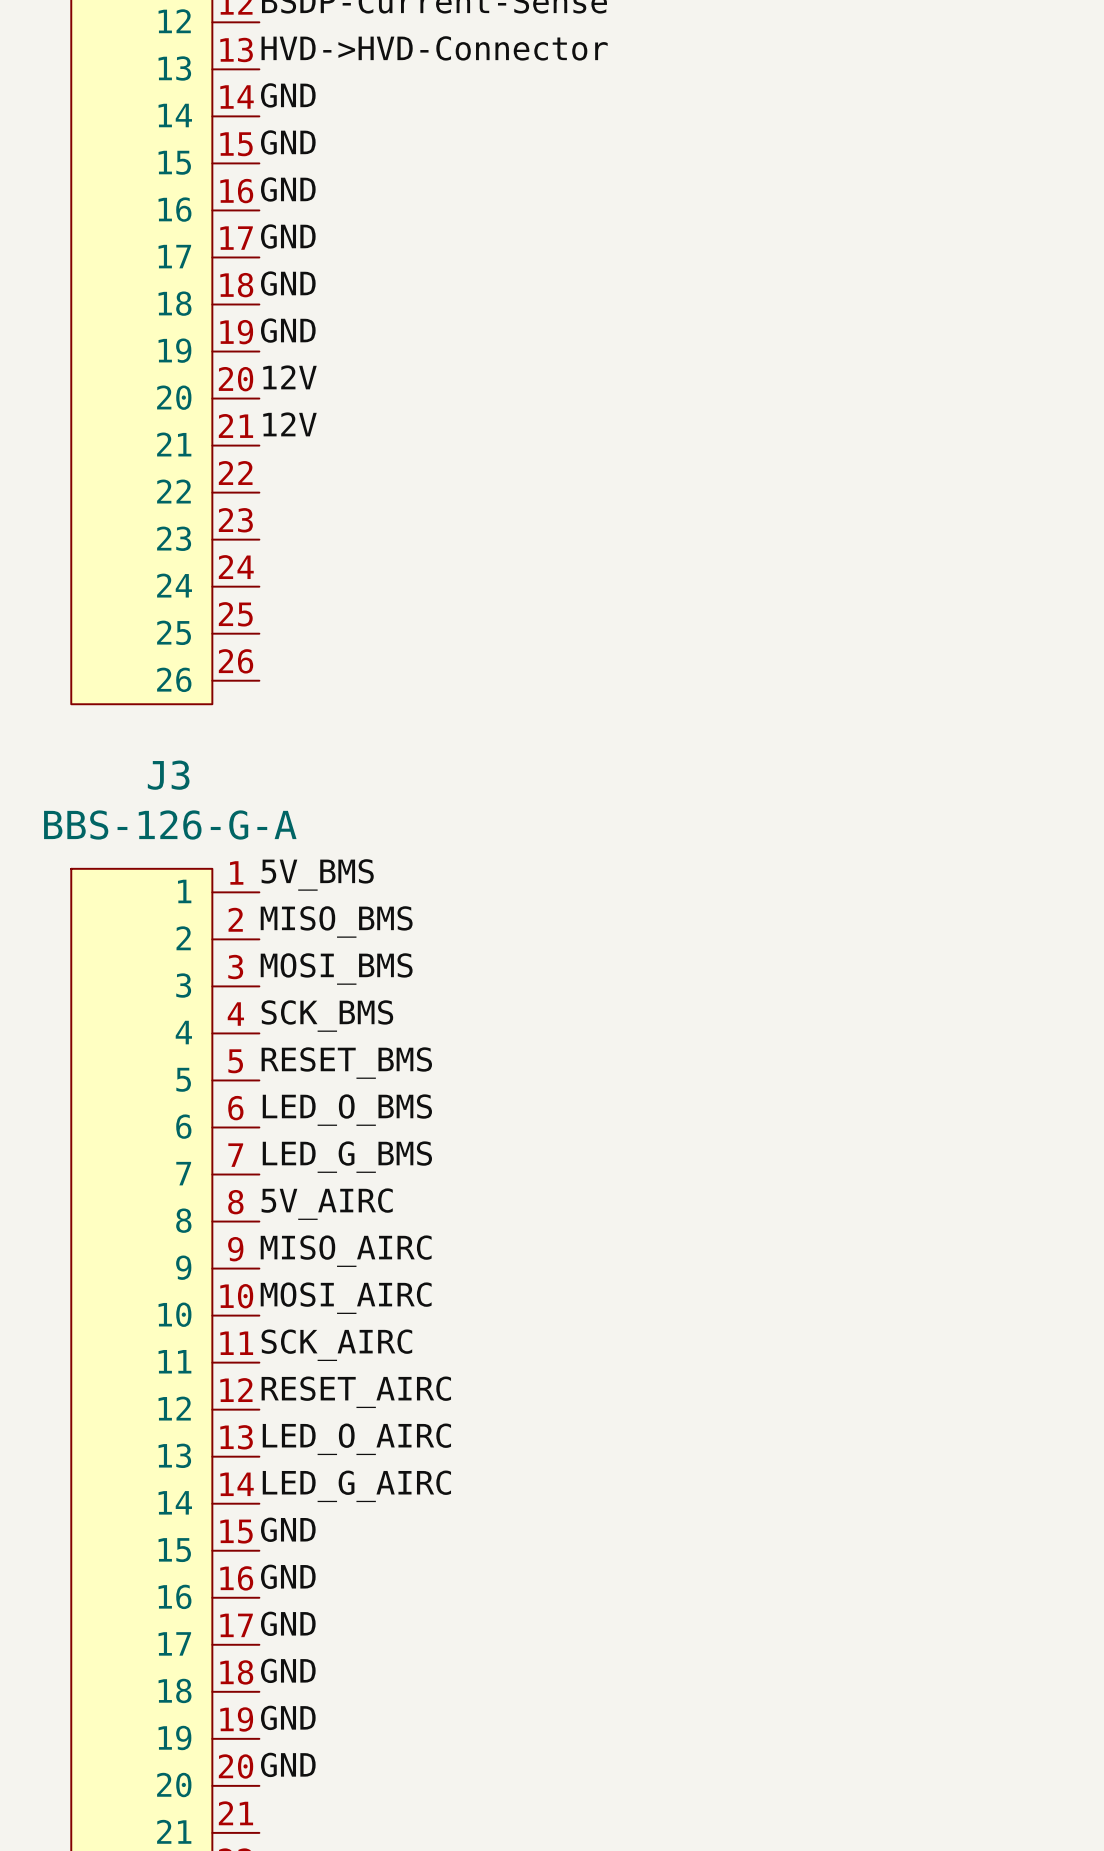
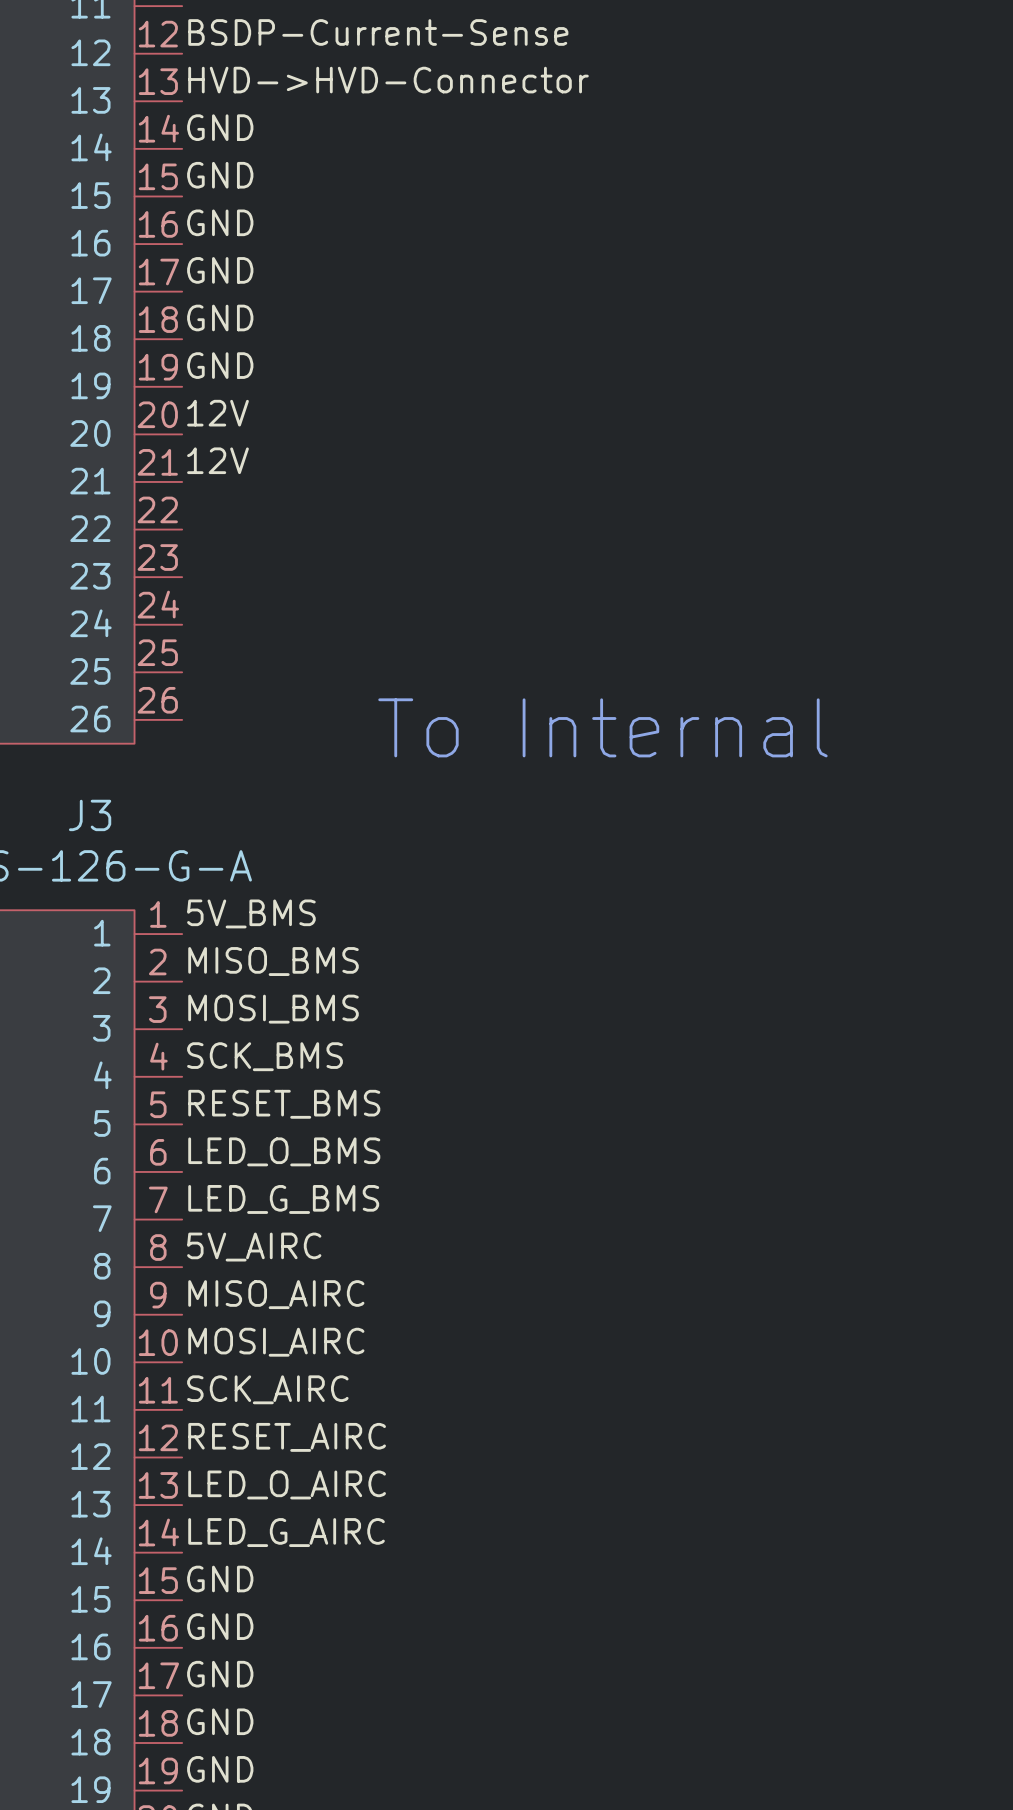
text: none -> To Internal (602, 727)

